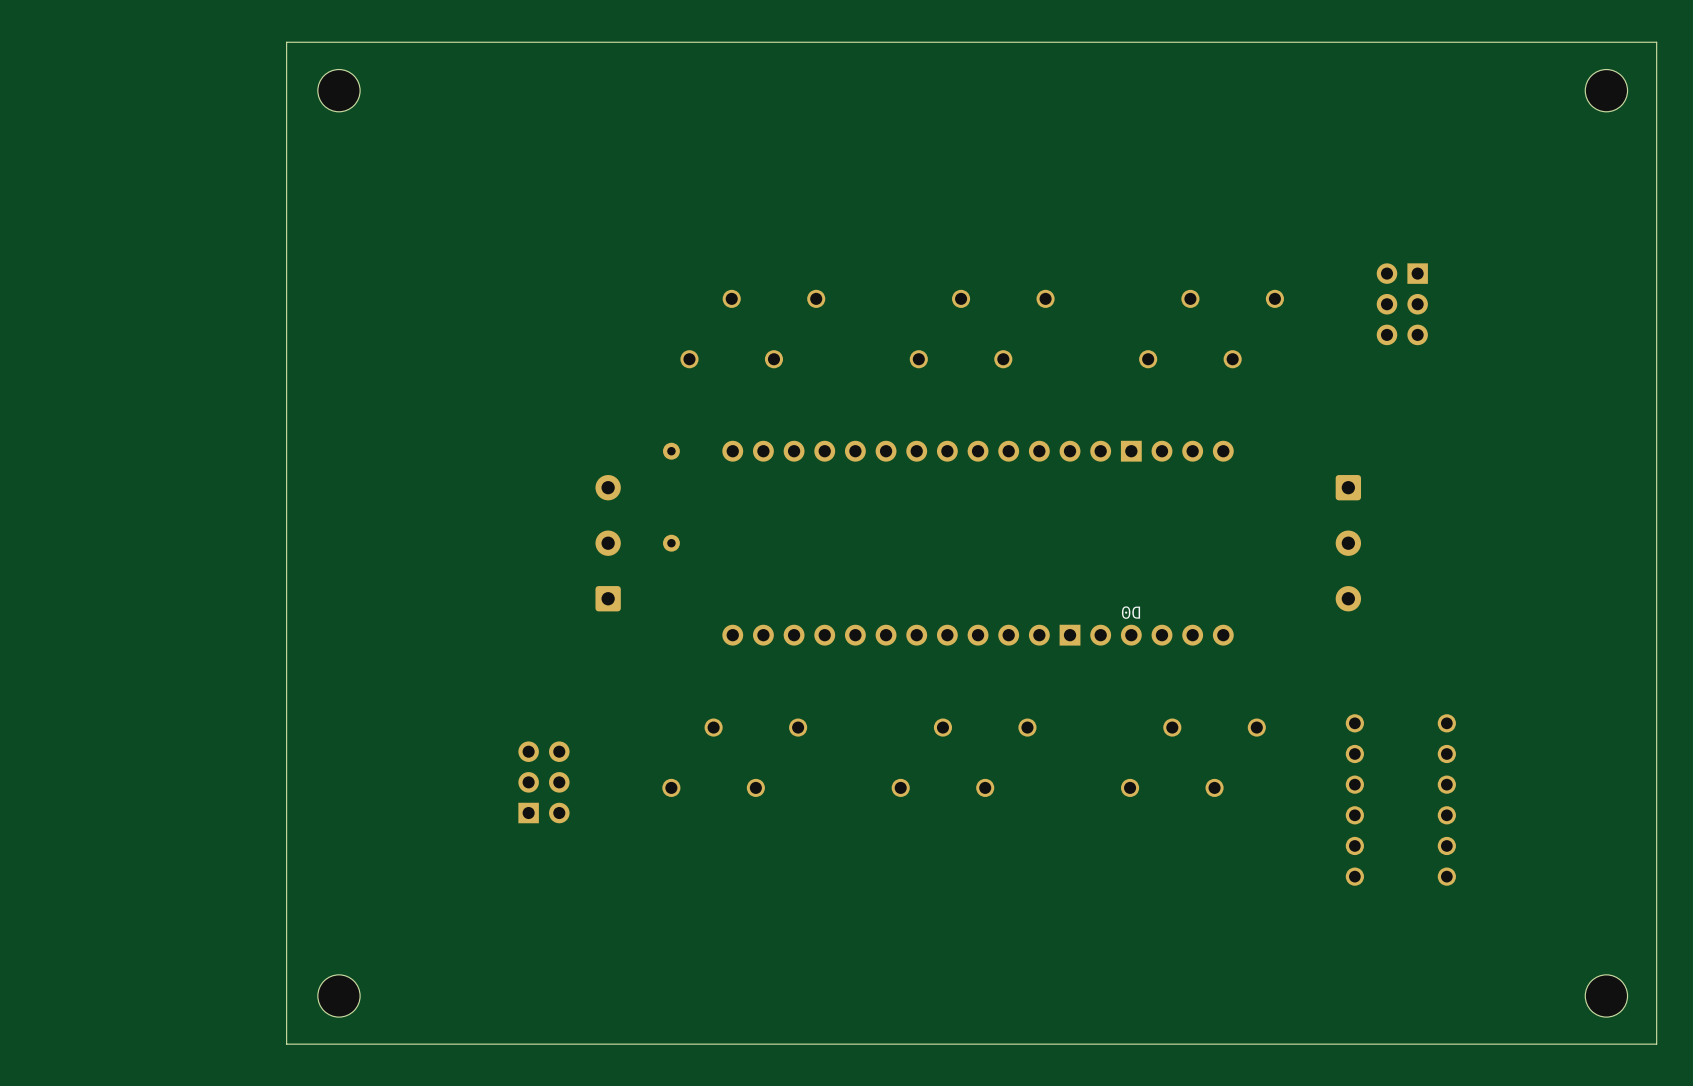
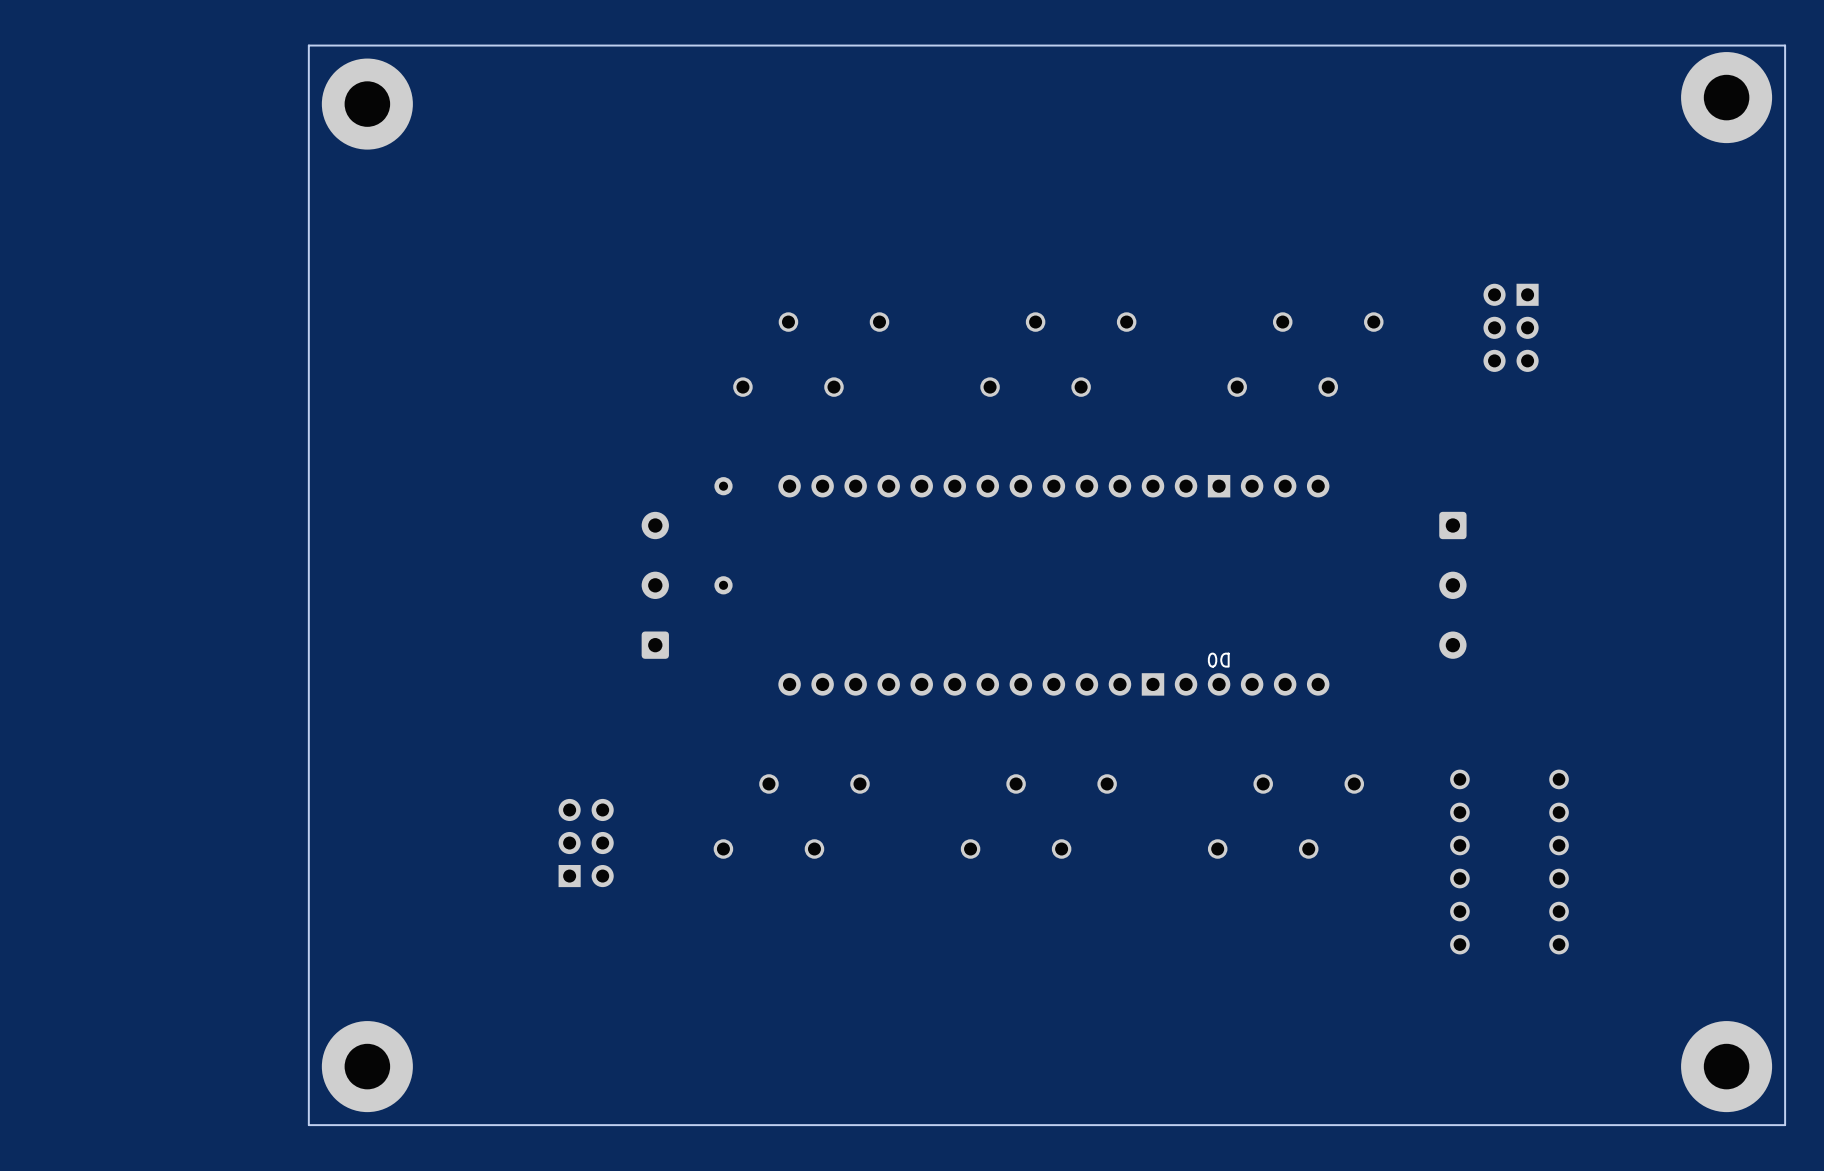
part footprint: [317, 69, 361, 112] -> [321, 58, 413, 150]
part footprint: [1585, 69, 1628, 112] -> [1681, 52, 1773, 144]
part footprint: [317, 974, 361, 1018] -> [321, 1021, 413, 1113]
part footprint: [1585, 974, 1628, 1018] -> [1681, 1021, 1773, 1113]

